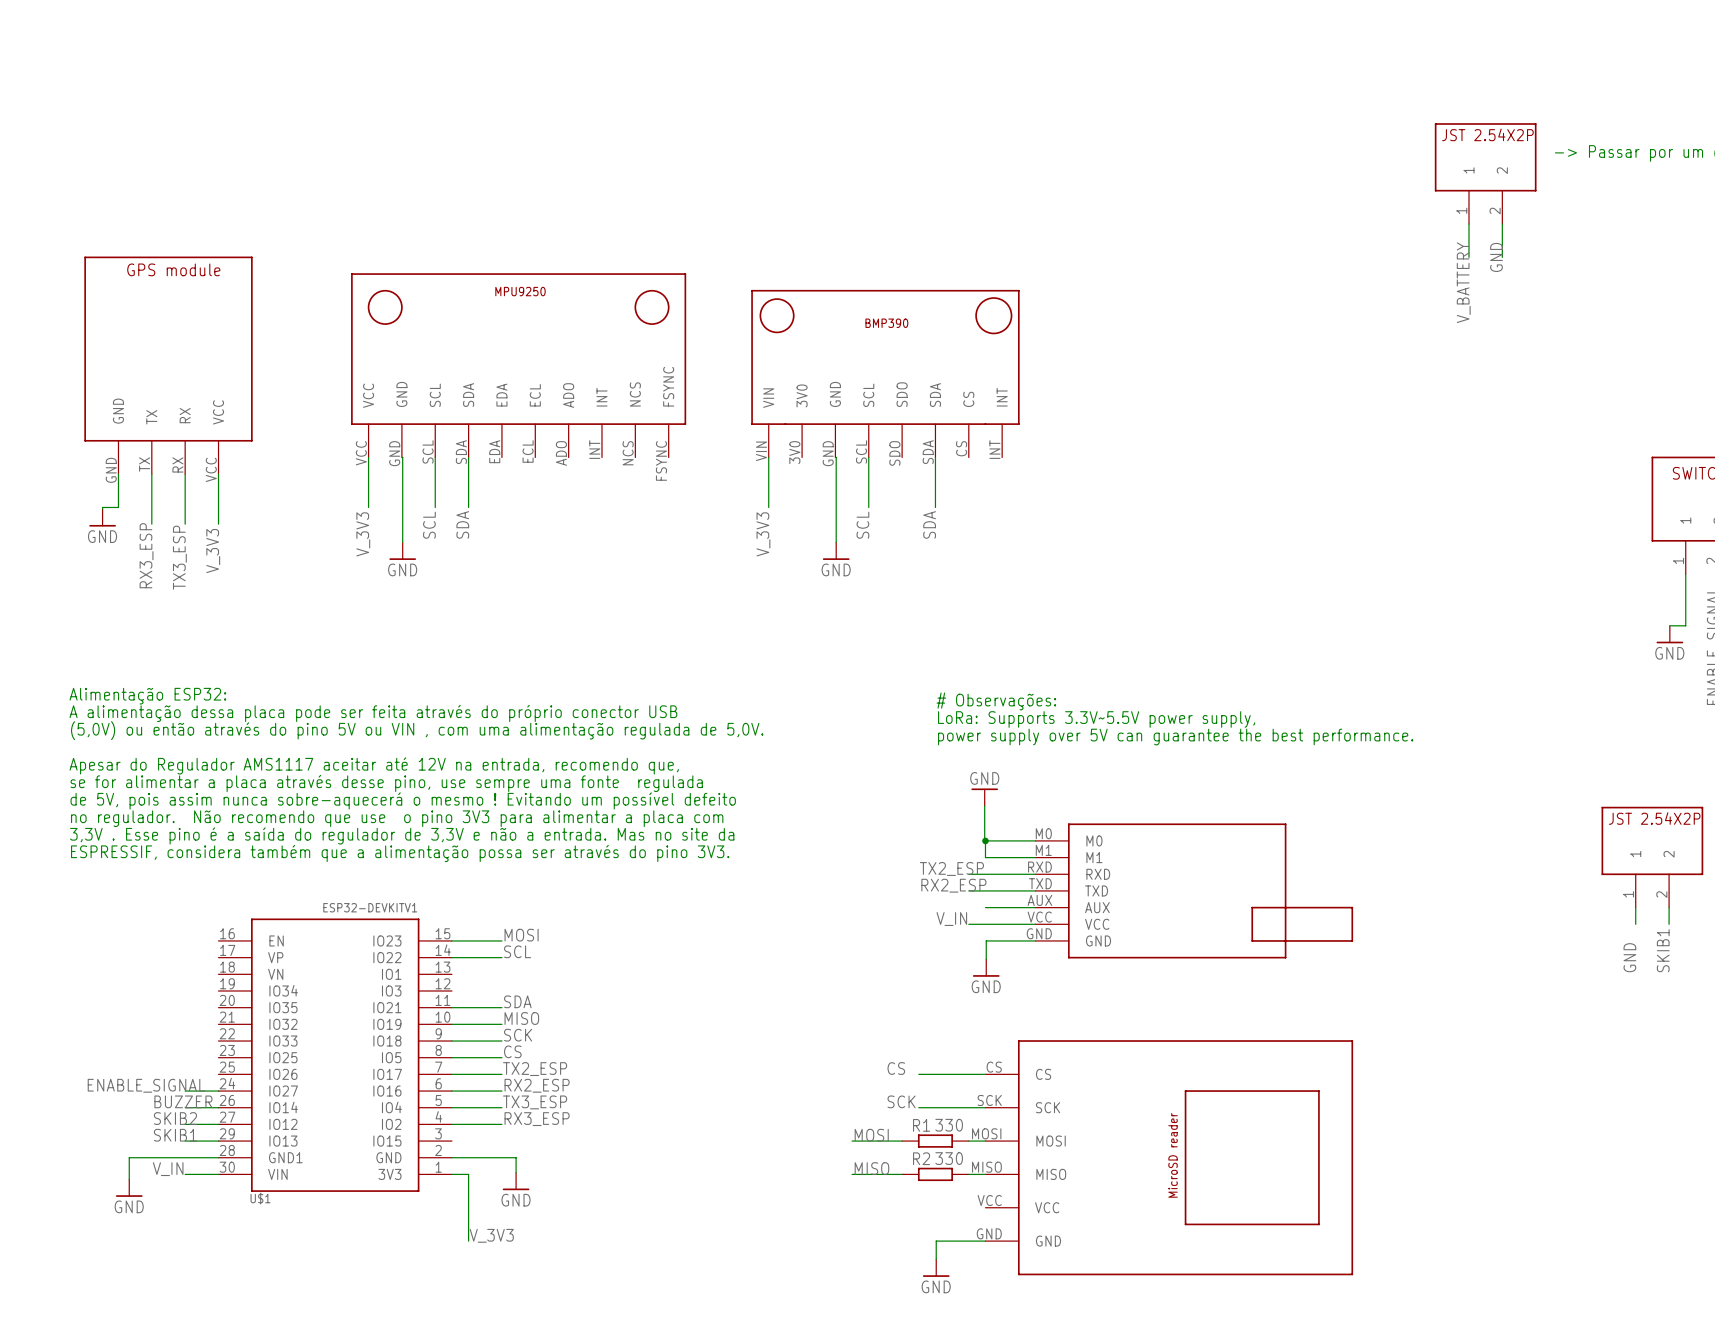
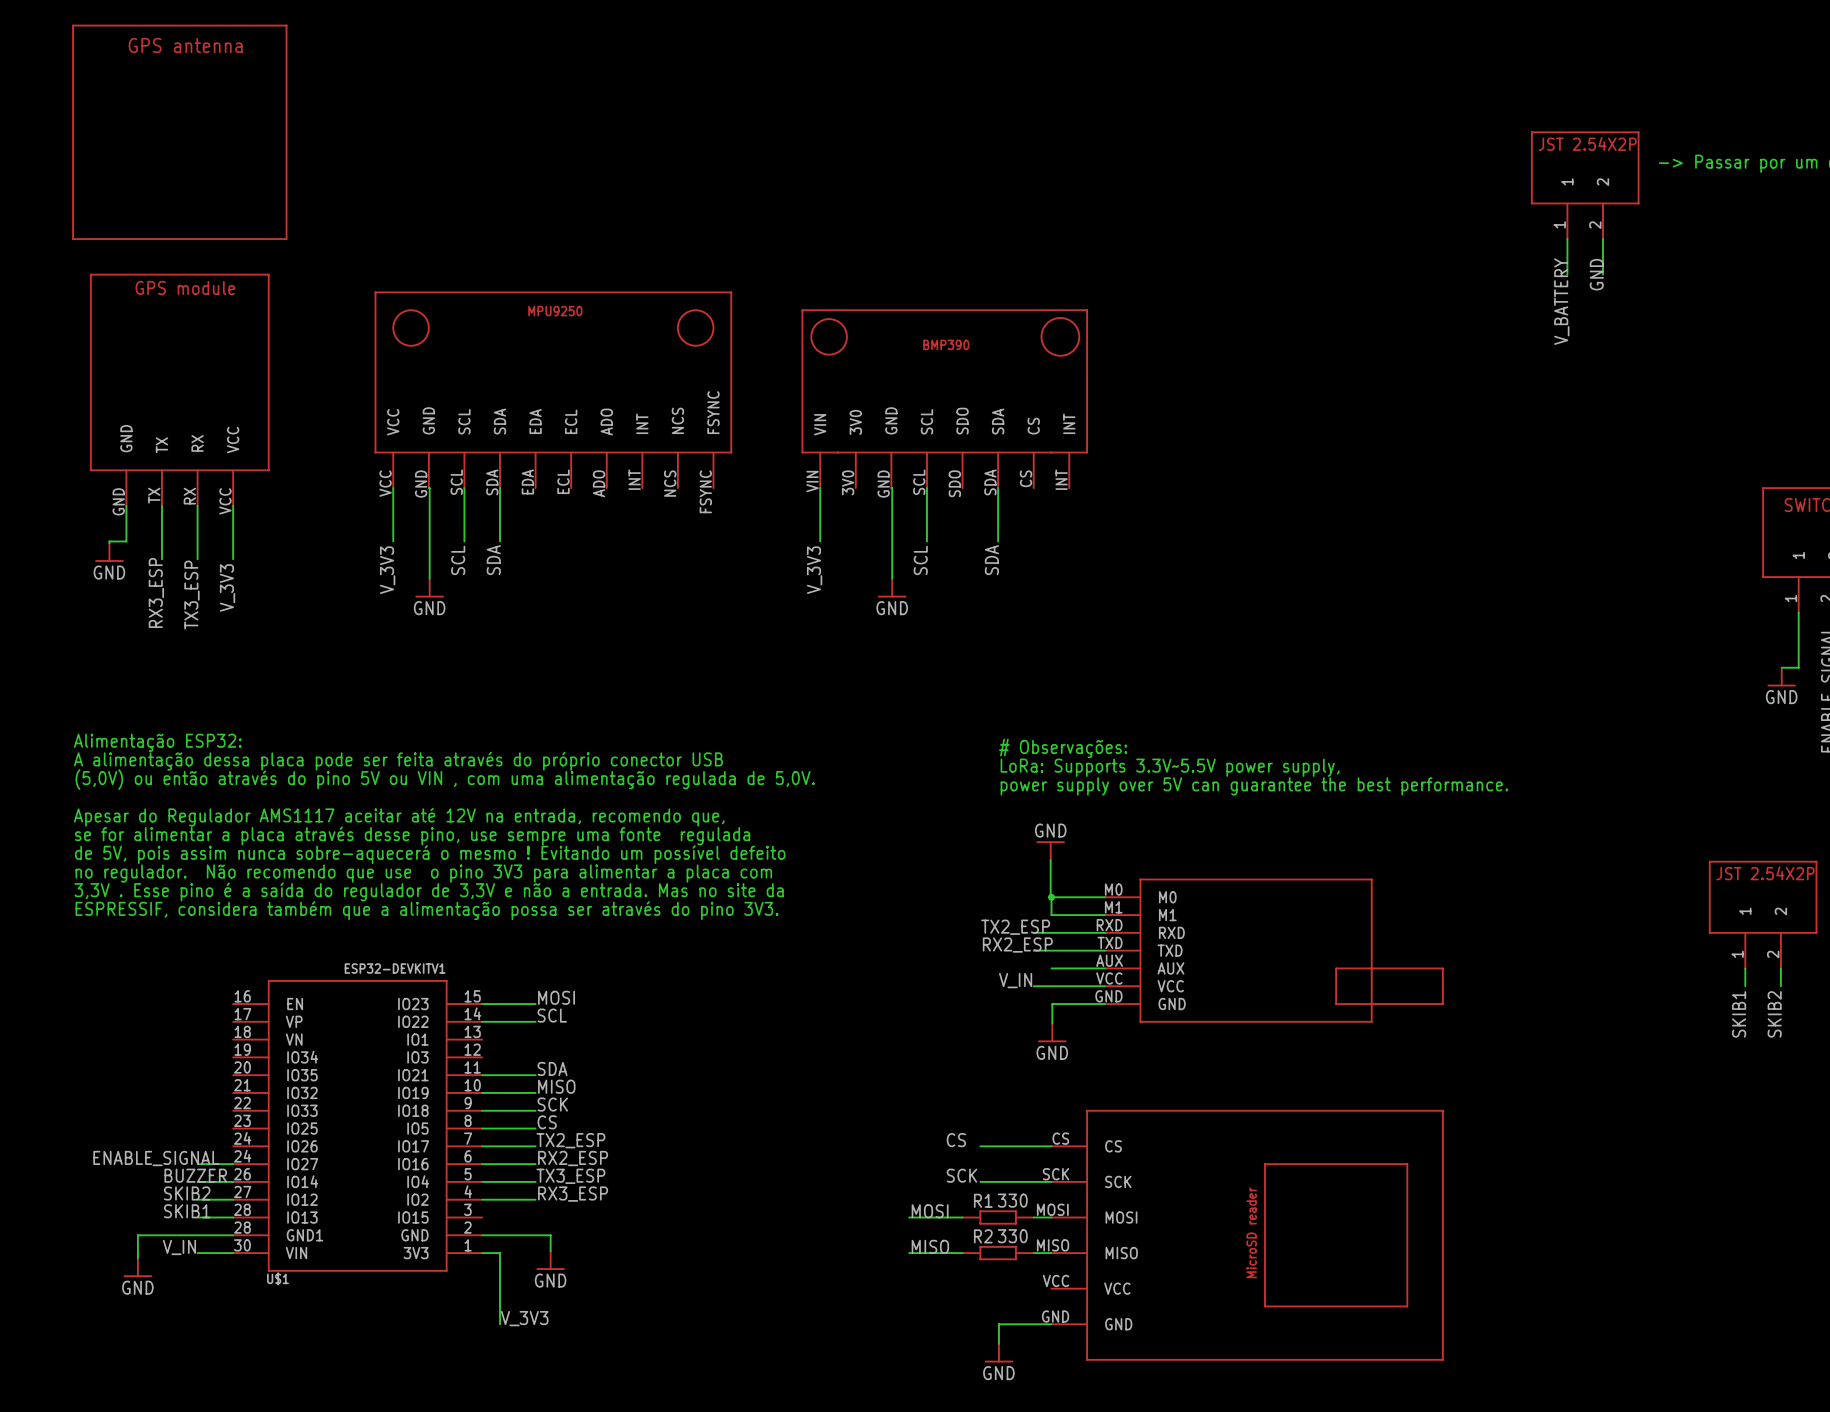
part: none -> (179, 132)
label: SKIB1 (1663, 950) -> SKIB2 (1774, 1014)
label: GND (1629, 957) -> SKIB1 (1739, 1014)
U$1 pin number: 25 (227, 1067) -> 24 (242, 1138)
U$1 pin number: 29 (227, 1133) -> 28 (242, 1209)

